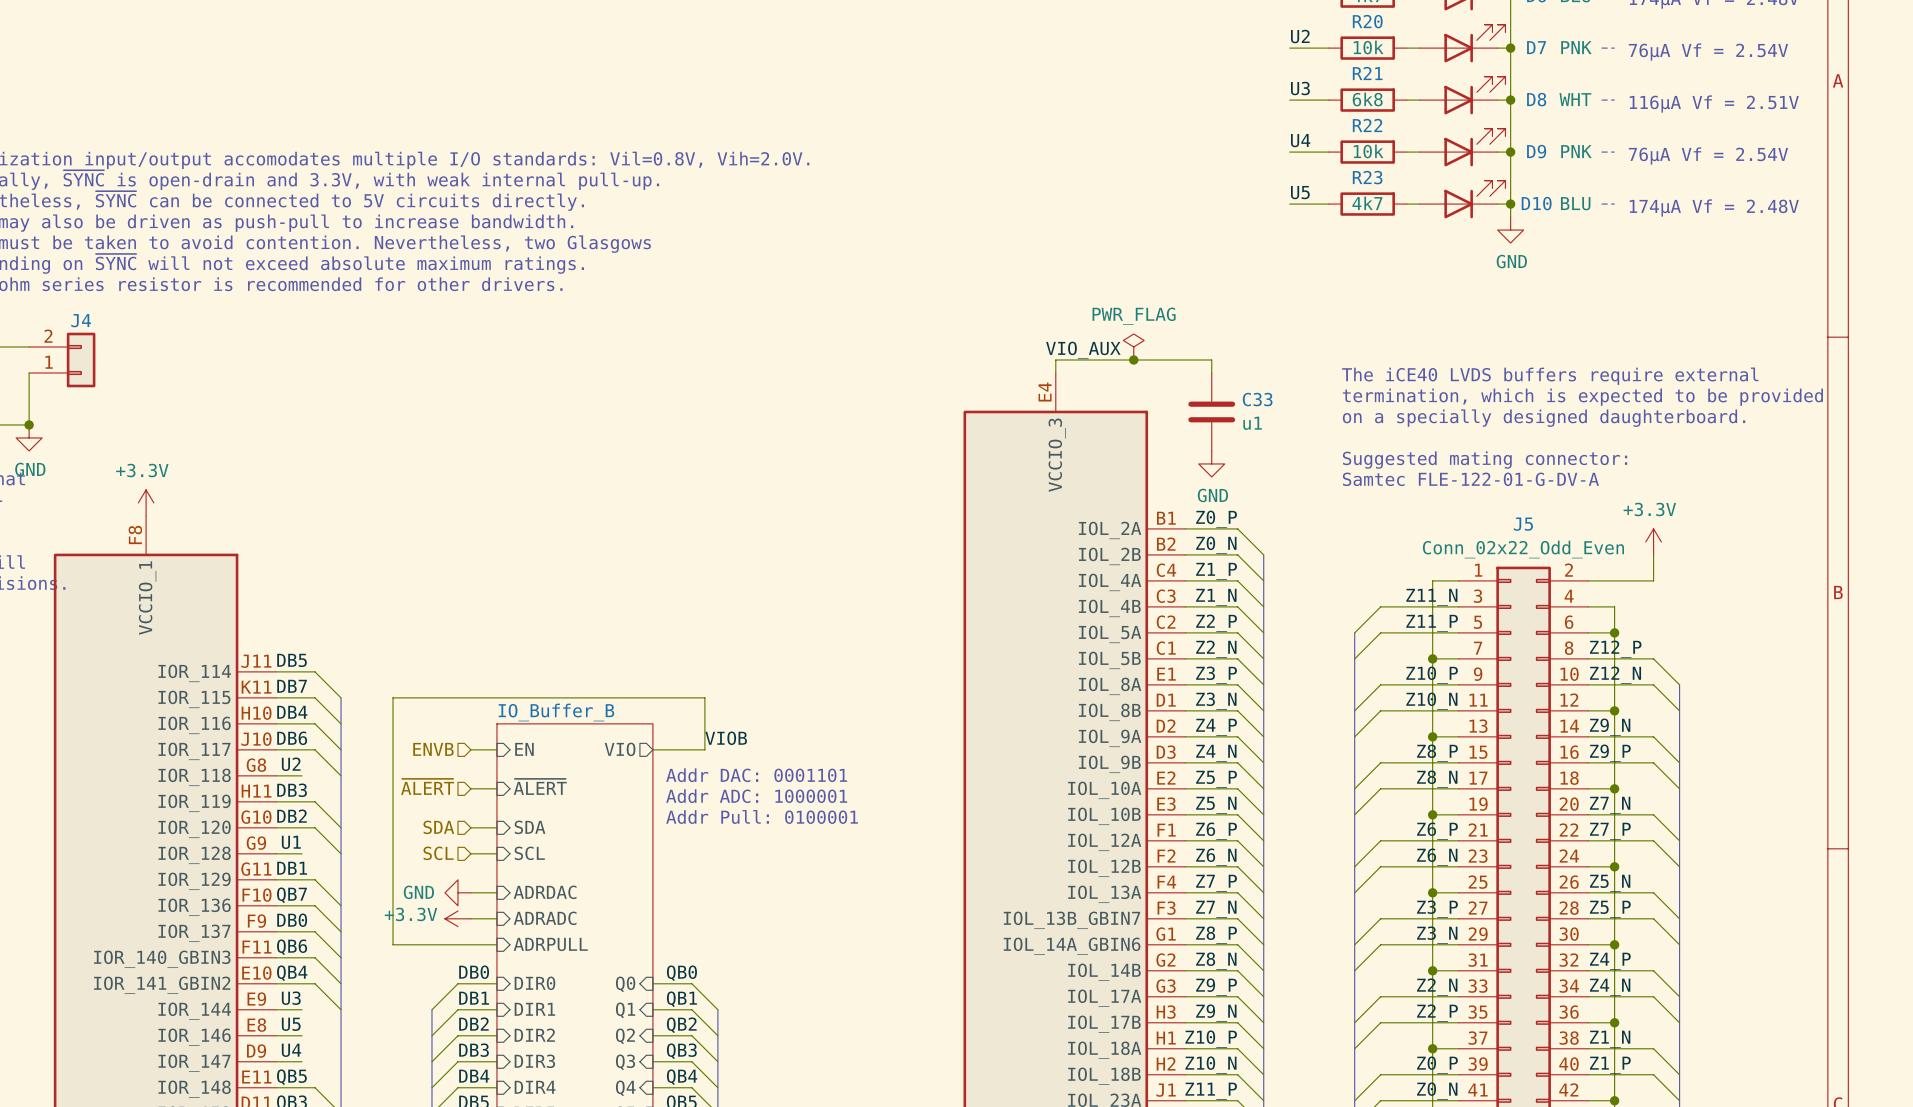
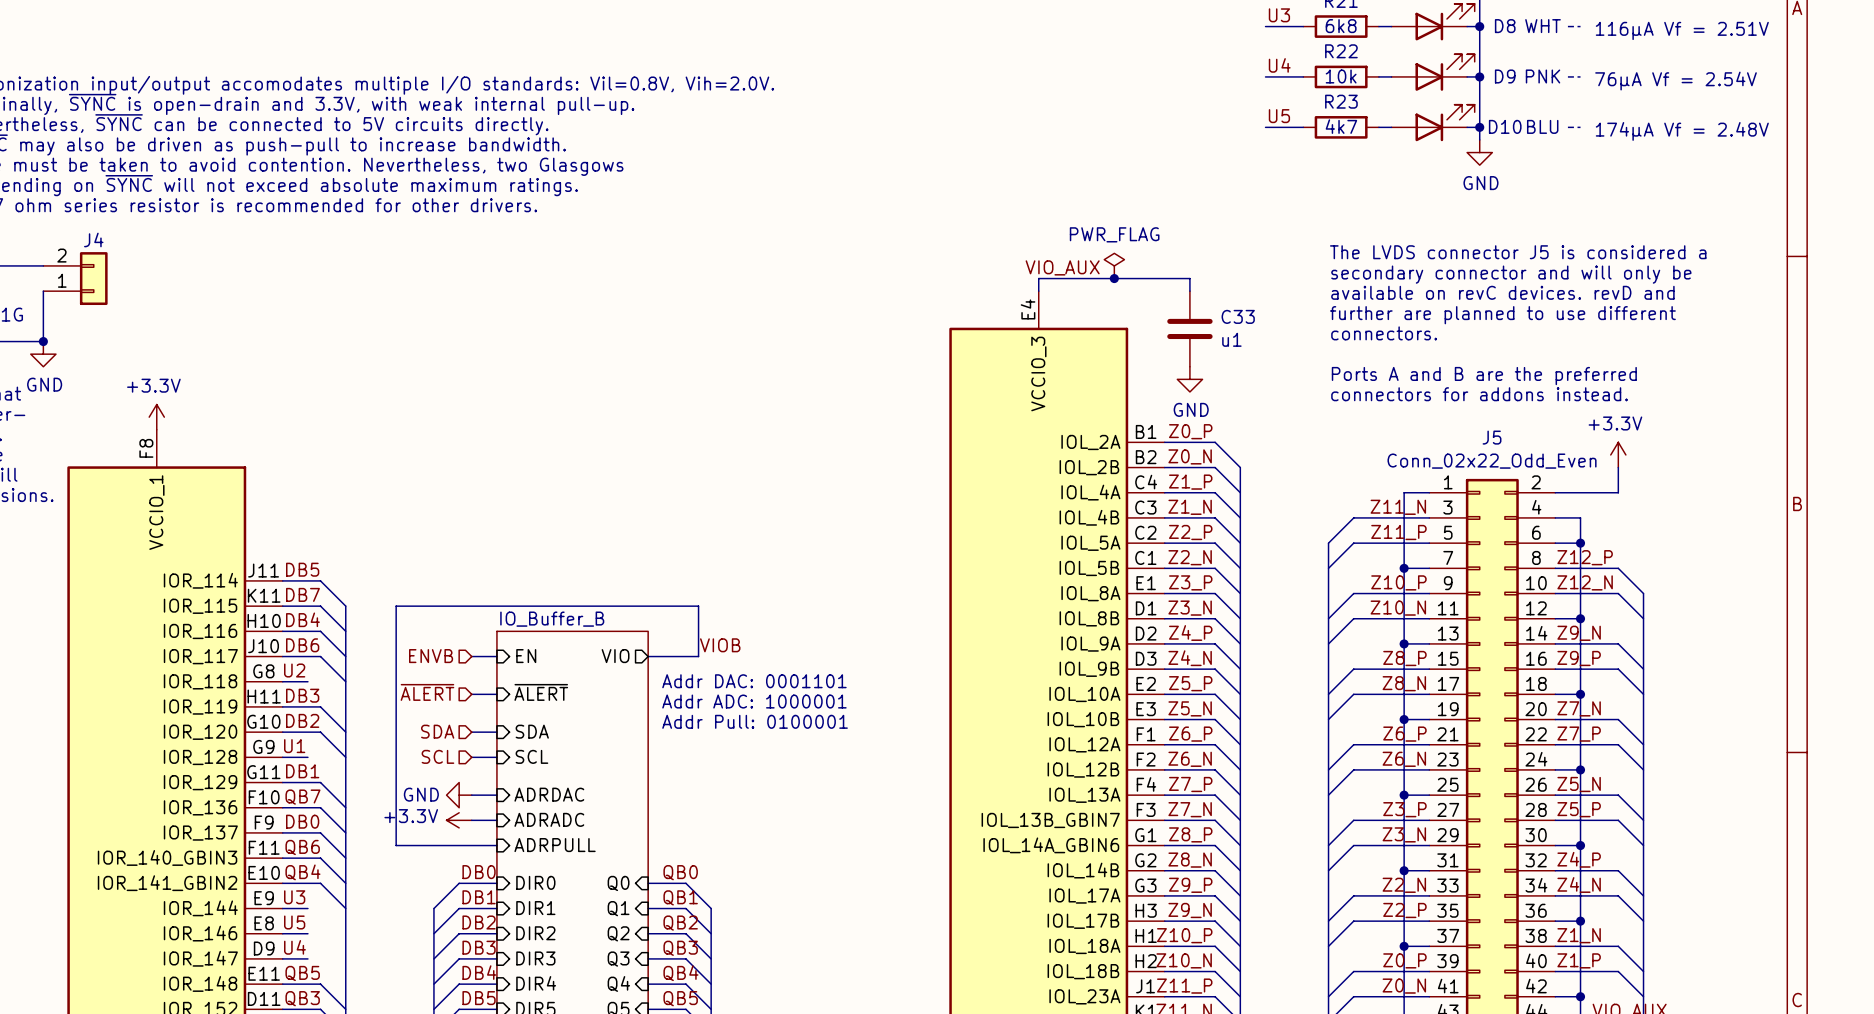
text: none -> The LVDS connector J5 is considered a (1518, 252)
text: none -> secondary connector and will only be (1511, 274)
text: none -> available on revC devices. revD and (1502, 292)
text: The iCE40 LVDS buffers require external (1550, 376) -> none
text: none -> further are planned to use different (1502, 315)
text: termination, which is expected to be provided (1582, 397) -> none
text: none -> connectors. (1384, 333)
text: on a specially designed daughterboard. (1544, 418) -> none
text: none -> Ports A and B are the preferred (1484, 376)
text: Suggested mating connector: (1485, 460) -> none
text: Samtec FLE-122-01-G-DV-A (1470, 479) -> none
text: none -> connectors for addons instead. (1479, 394)

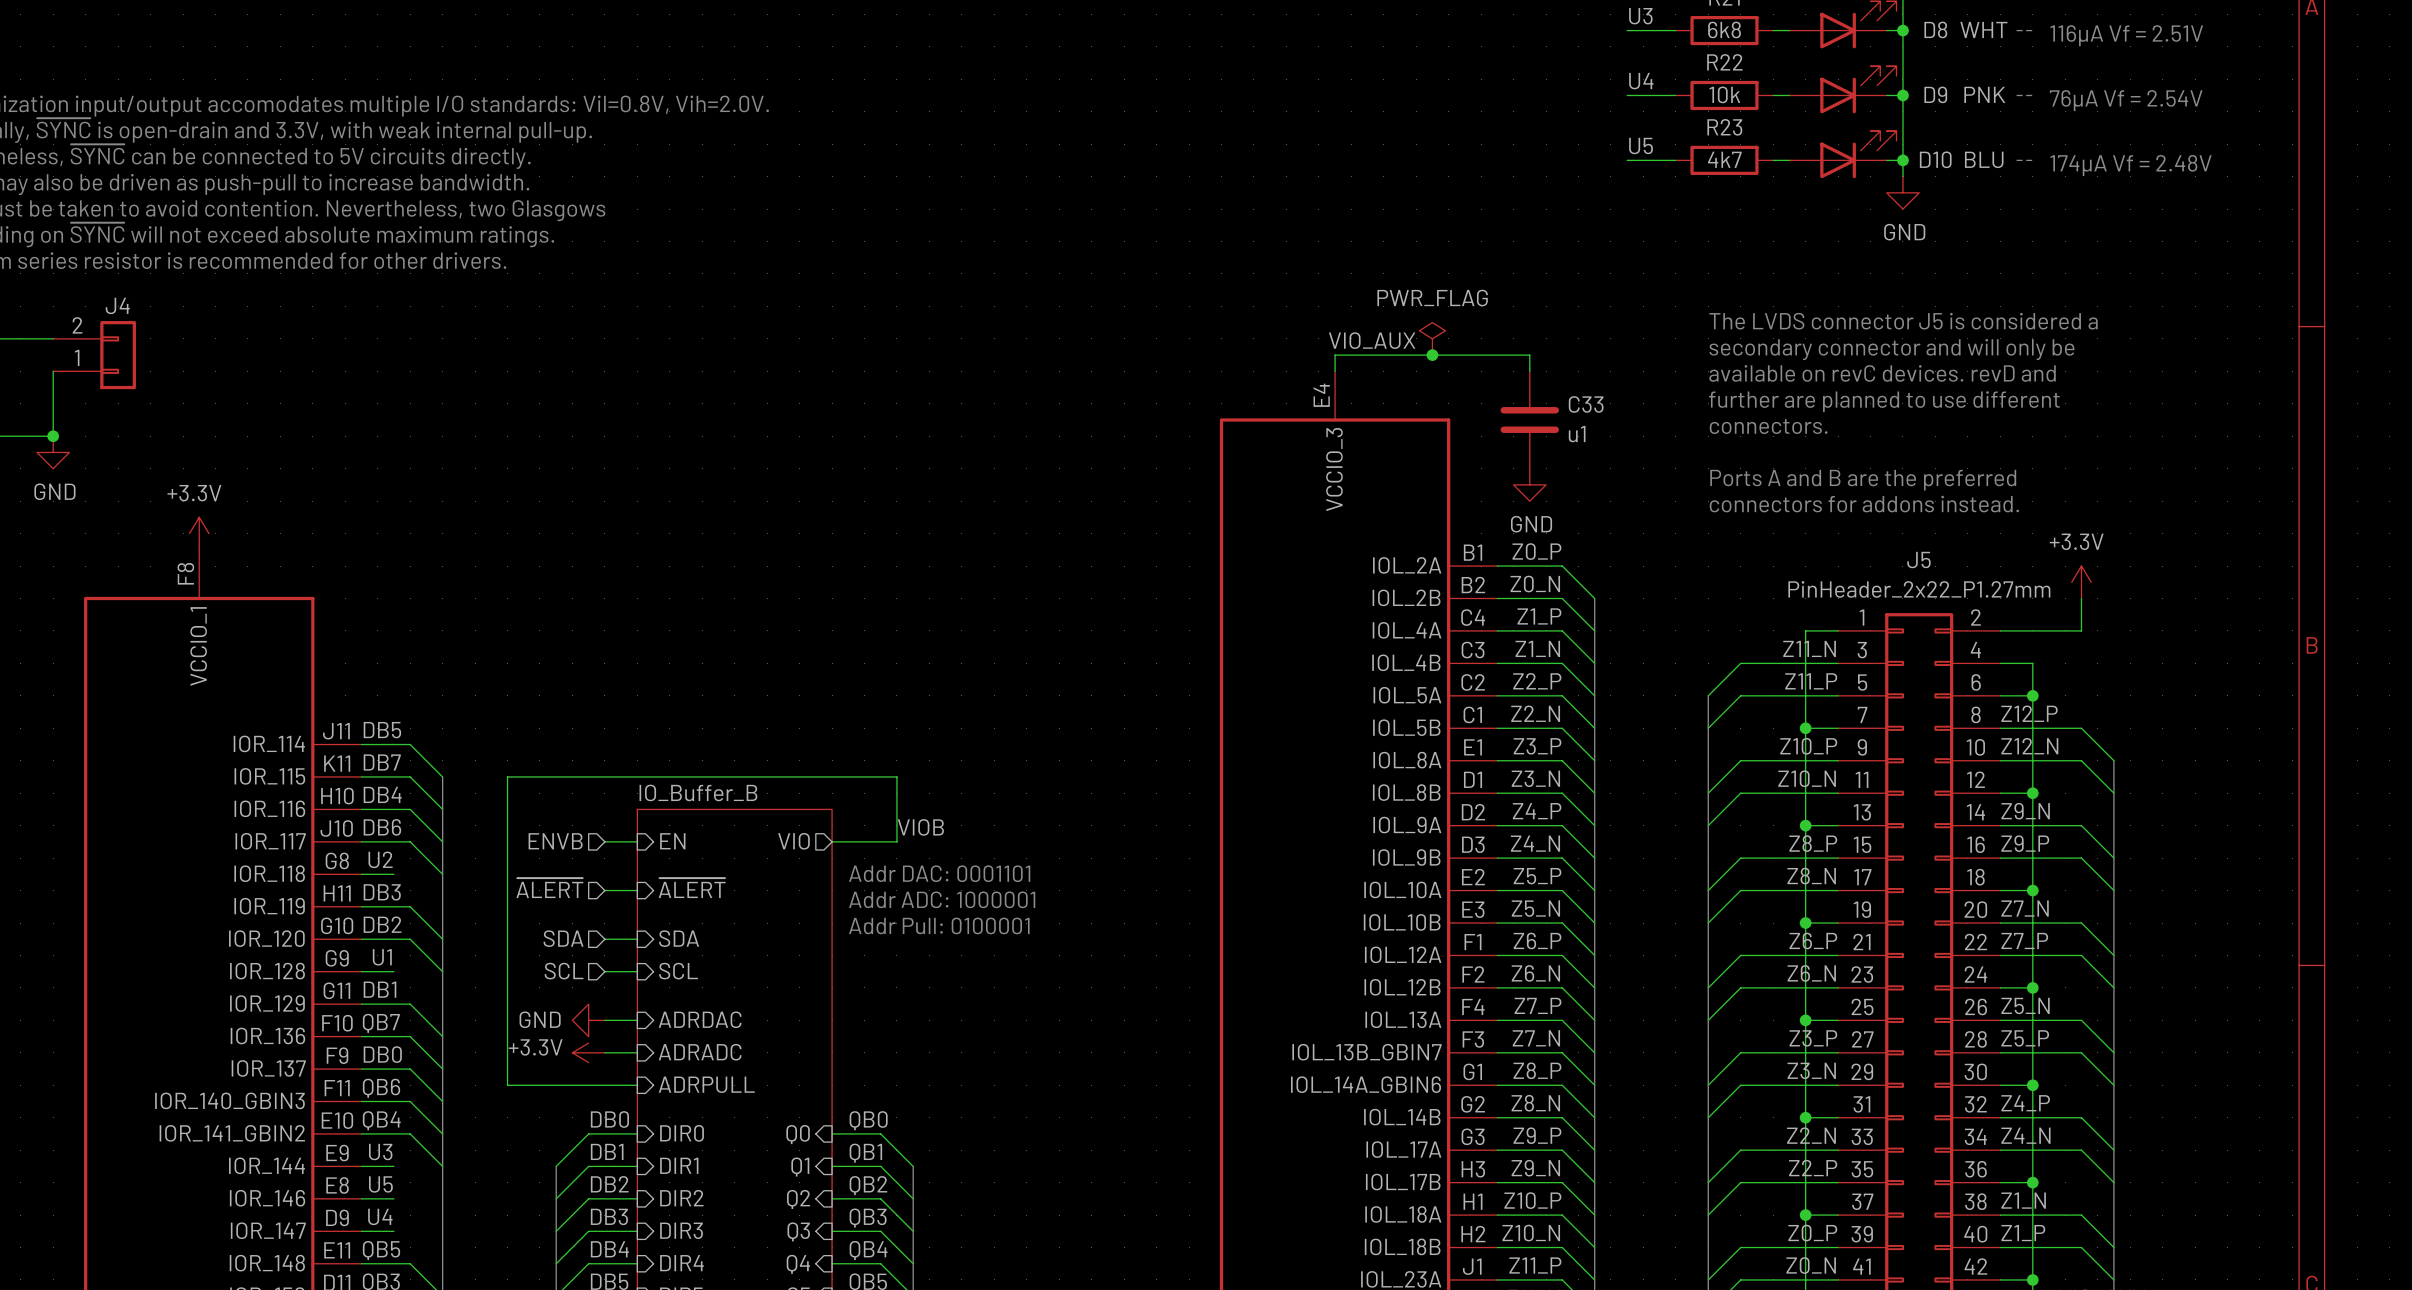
J5 value: Conn_02x22_Odd_Even (1492, 461) -> PinHeader_2x22_P1.27mm (1919, 589)

